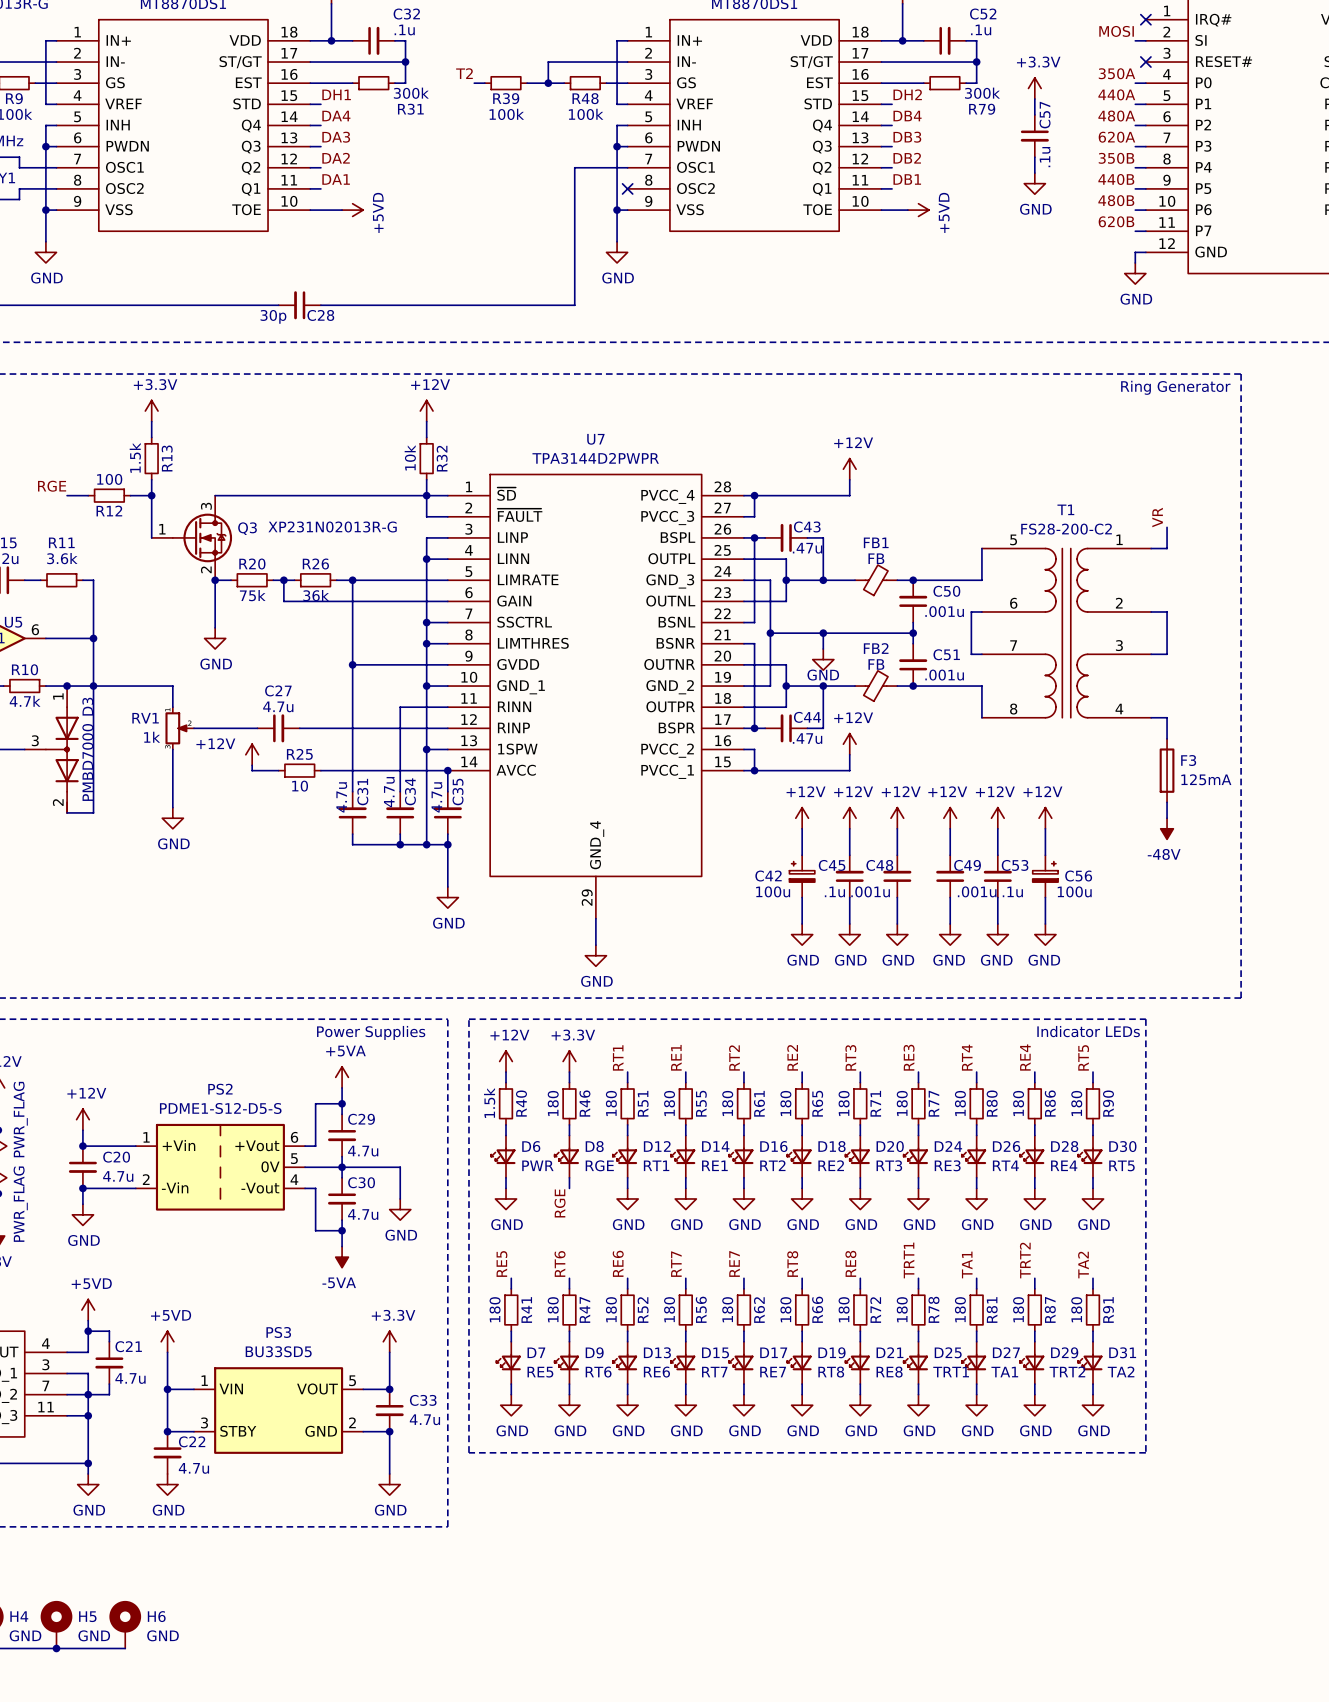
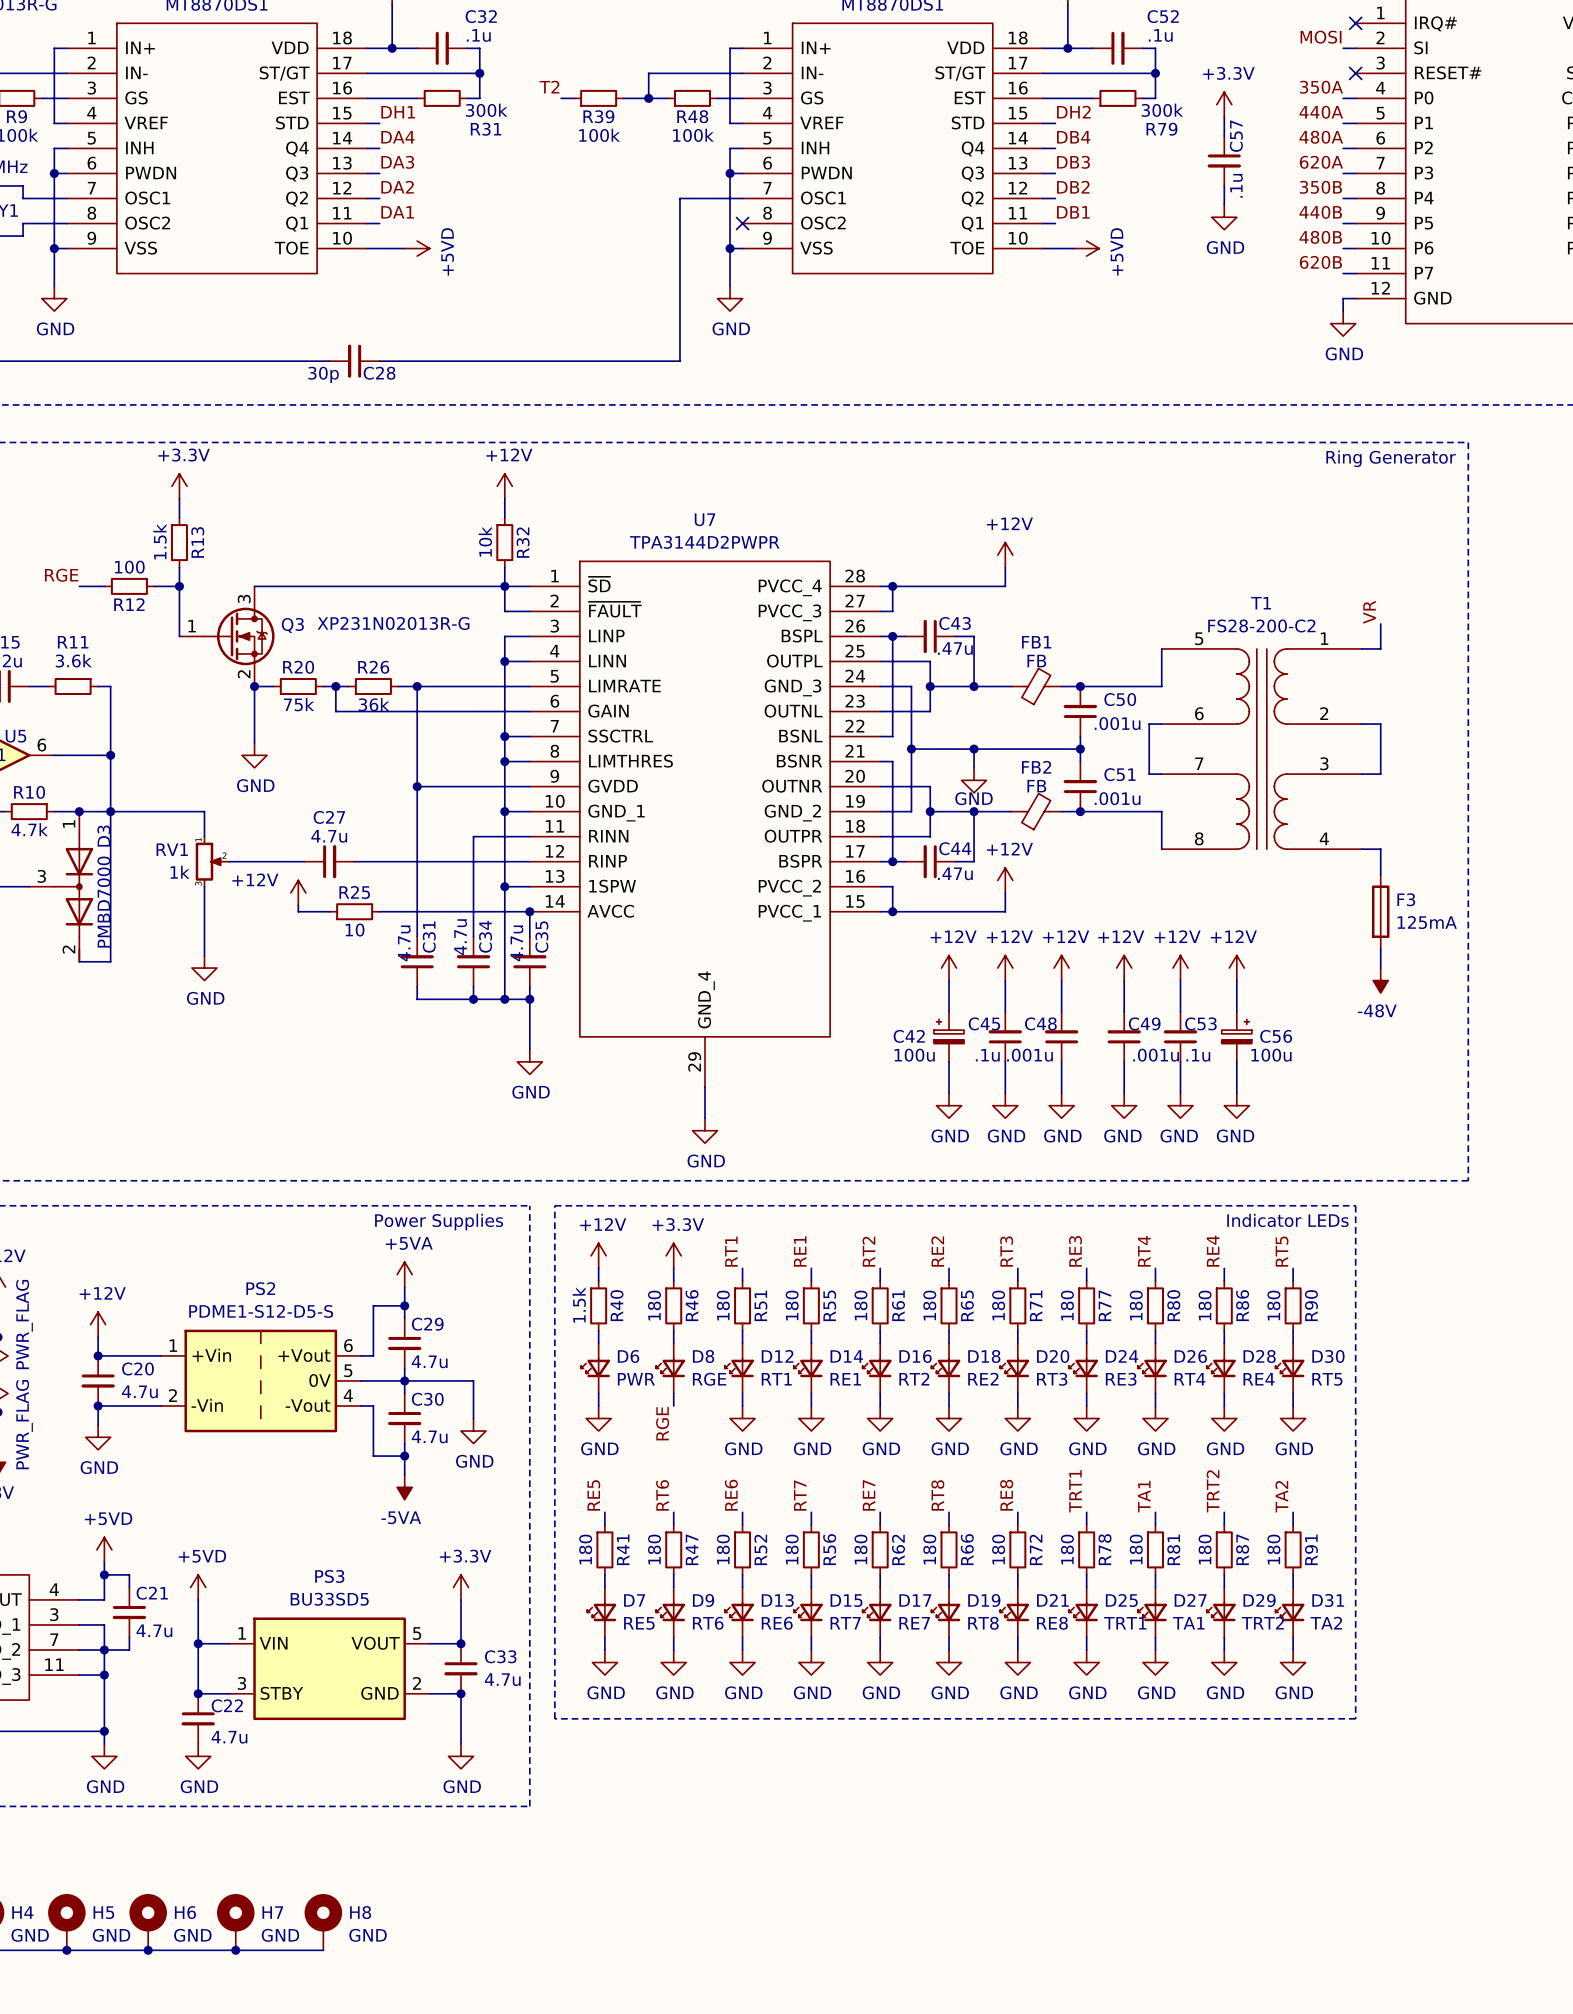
H7: none -> GND (235, 1922)
H8: none -> GND (323, 1922)
wire: none -> (148, 1950) (323, 1950)
junction: none -> (148, 1950)
junction: none -> (235, 1950)

